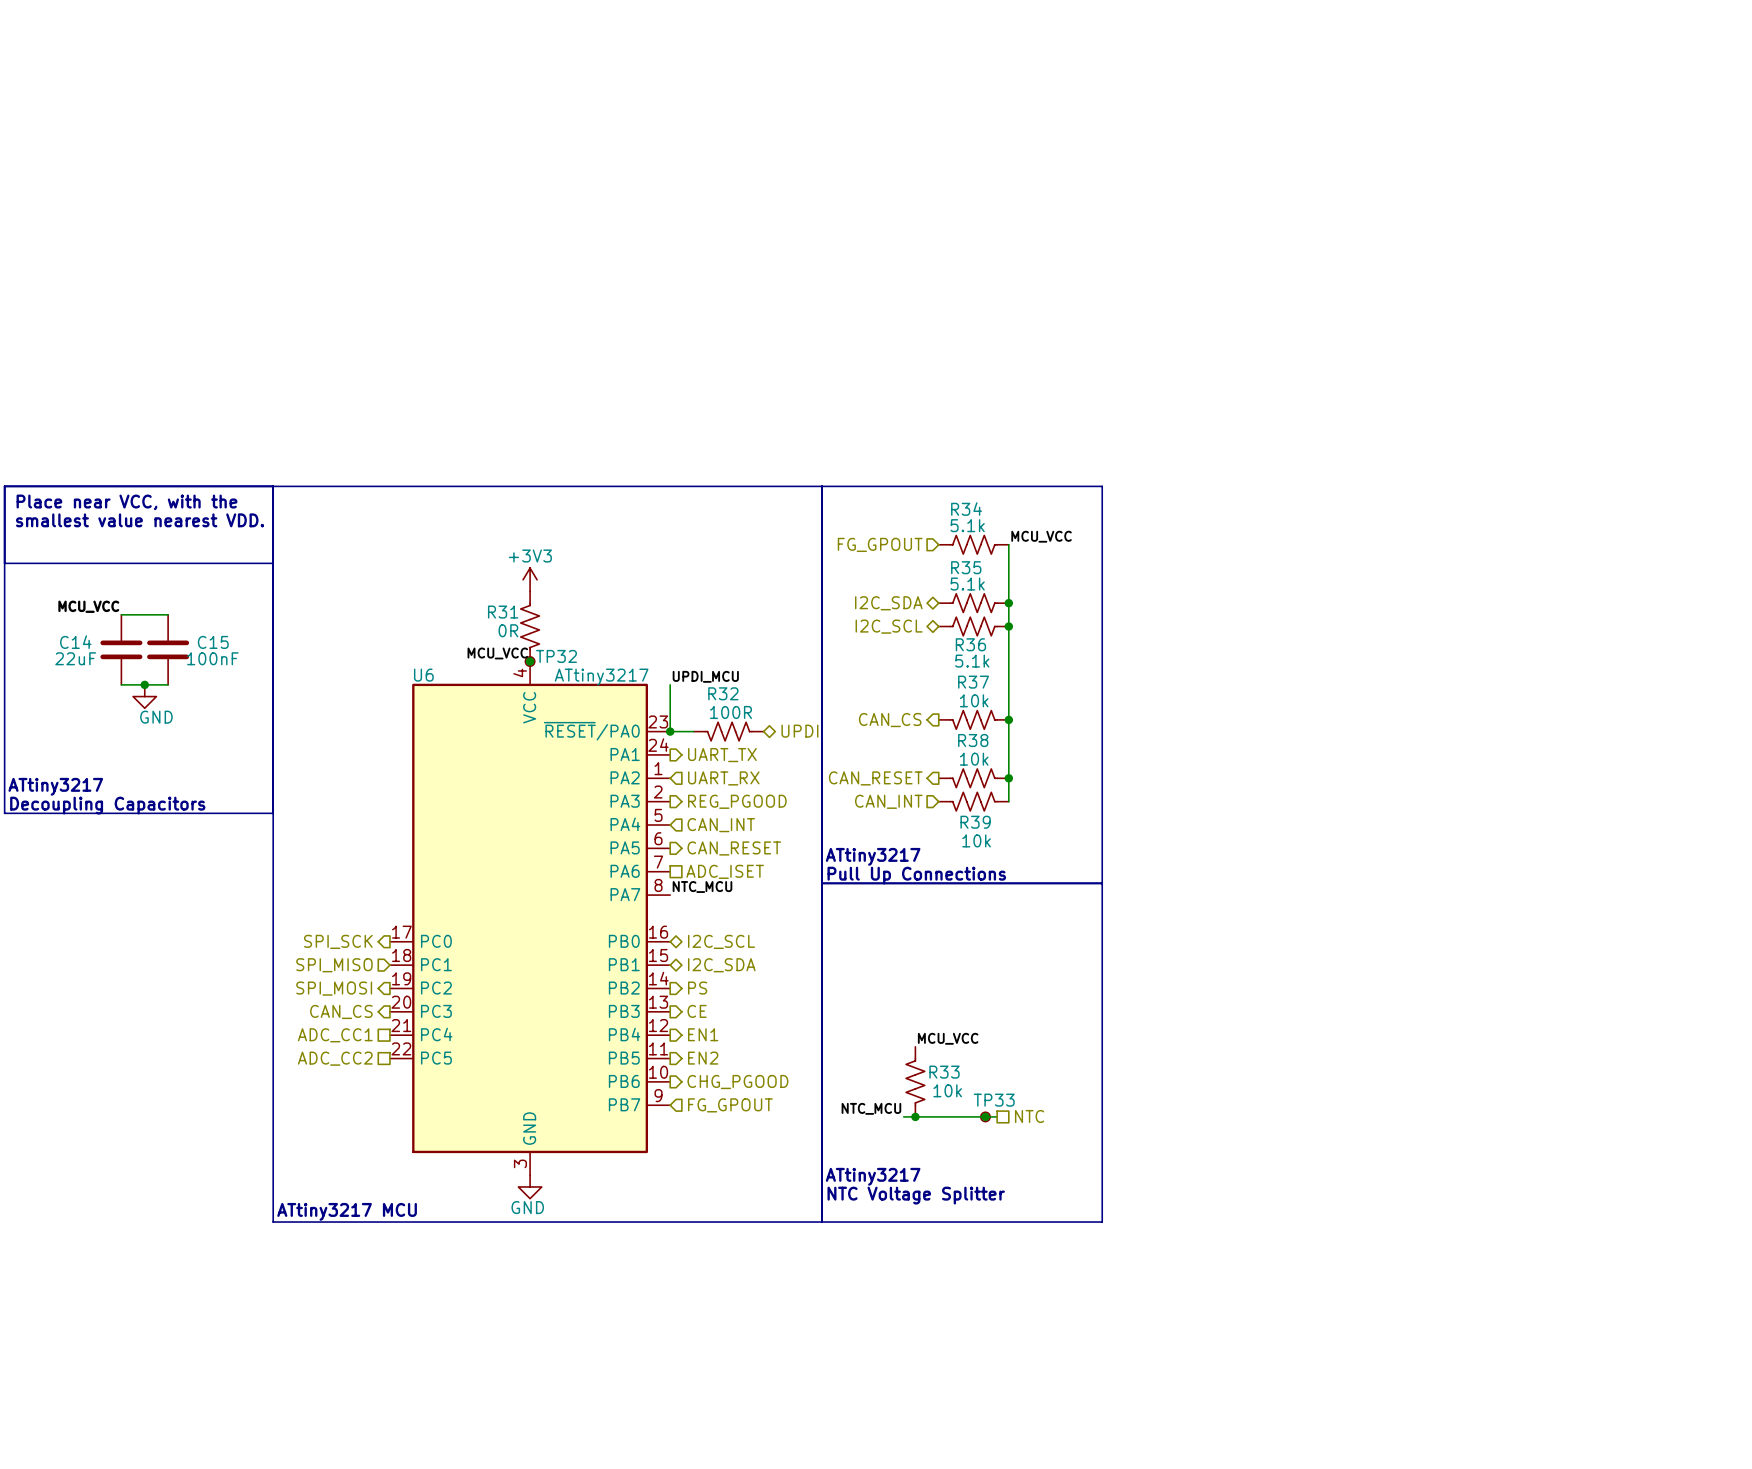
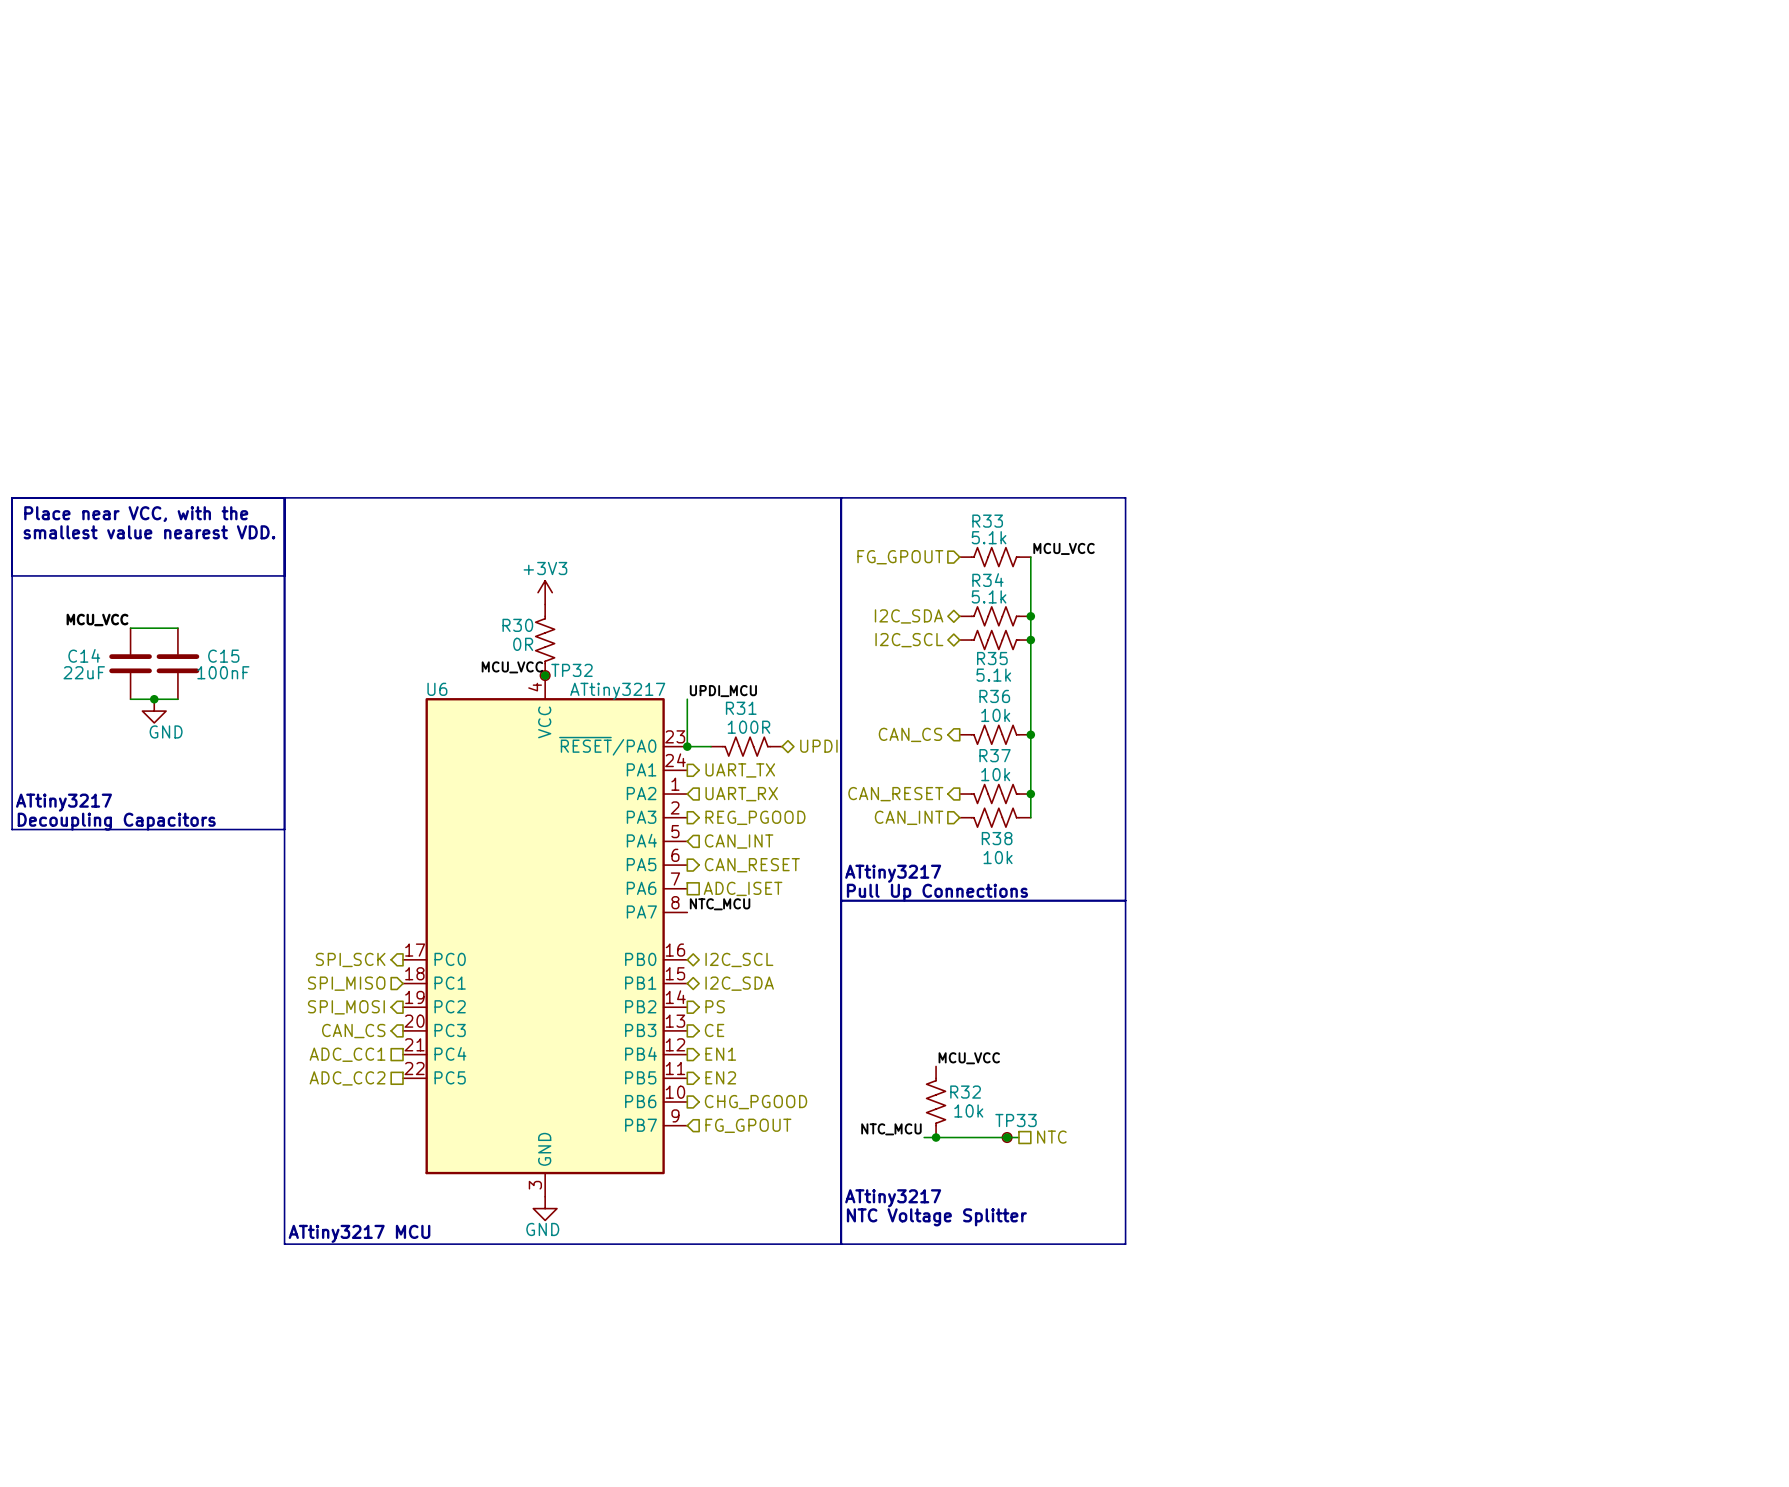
R34 name: R34 (966, 509) -> R33 (987, 521)
R35 name: R35 (966, 567) -> R34 (987, 580)
R31 name: R31 (503, 612) -> R30 (517, 625)
R36 name: R36 (970, 644) -> R35 (992, 658)
R37 name: R37 (973, 682) -> R36 (994, 696)
R32 name: R32 (723, 693) -> R31 (741, 708)
R38 name: R38 (973, 740) -> R37 (995, 755)
R39 name: R39 (975, 822) -> R38 (997, 838)
R33 name: R33 (944, 1072) -> R32 (965, 1092)

